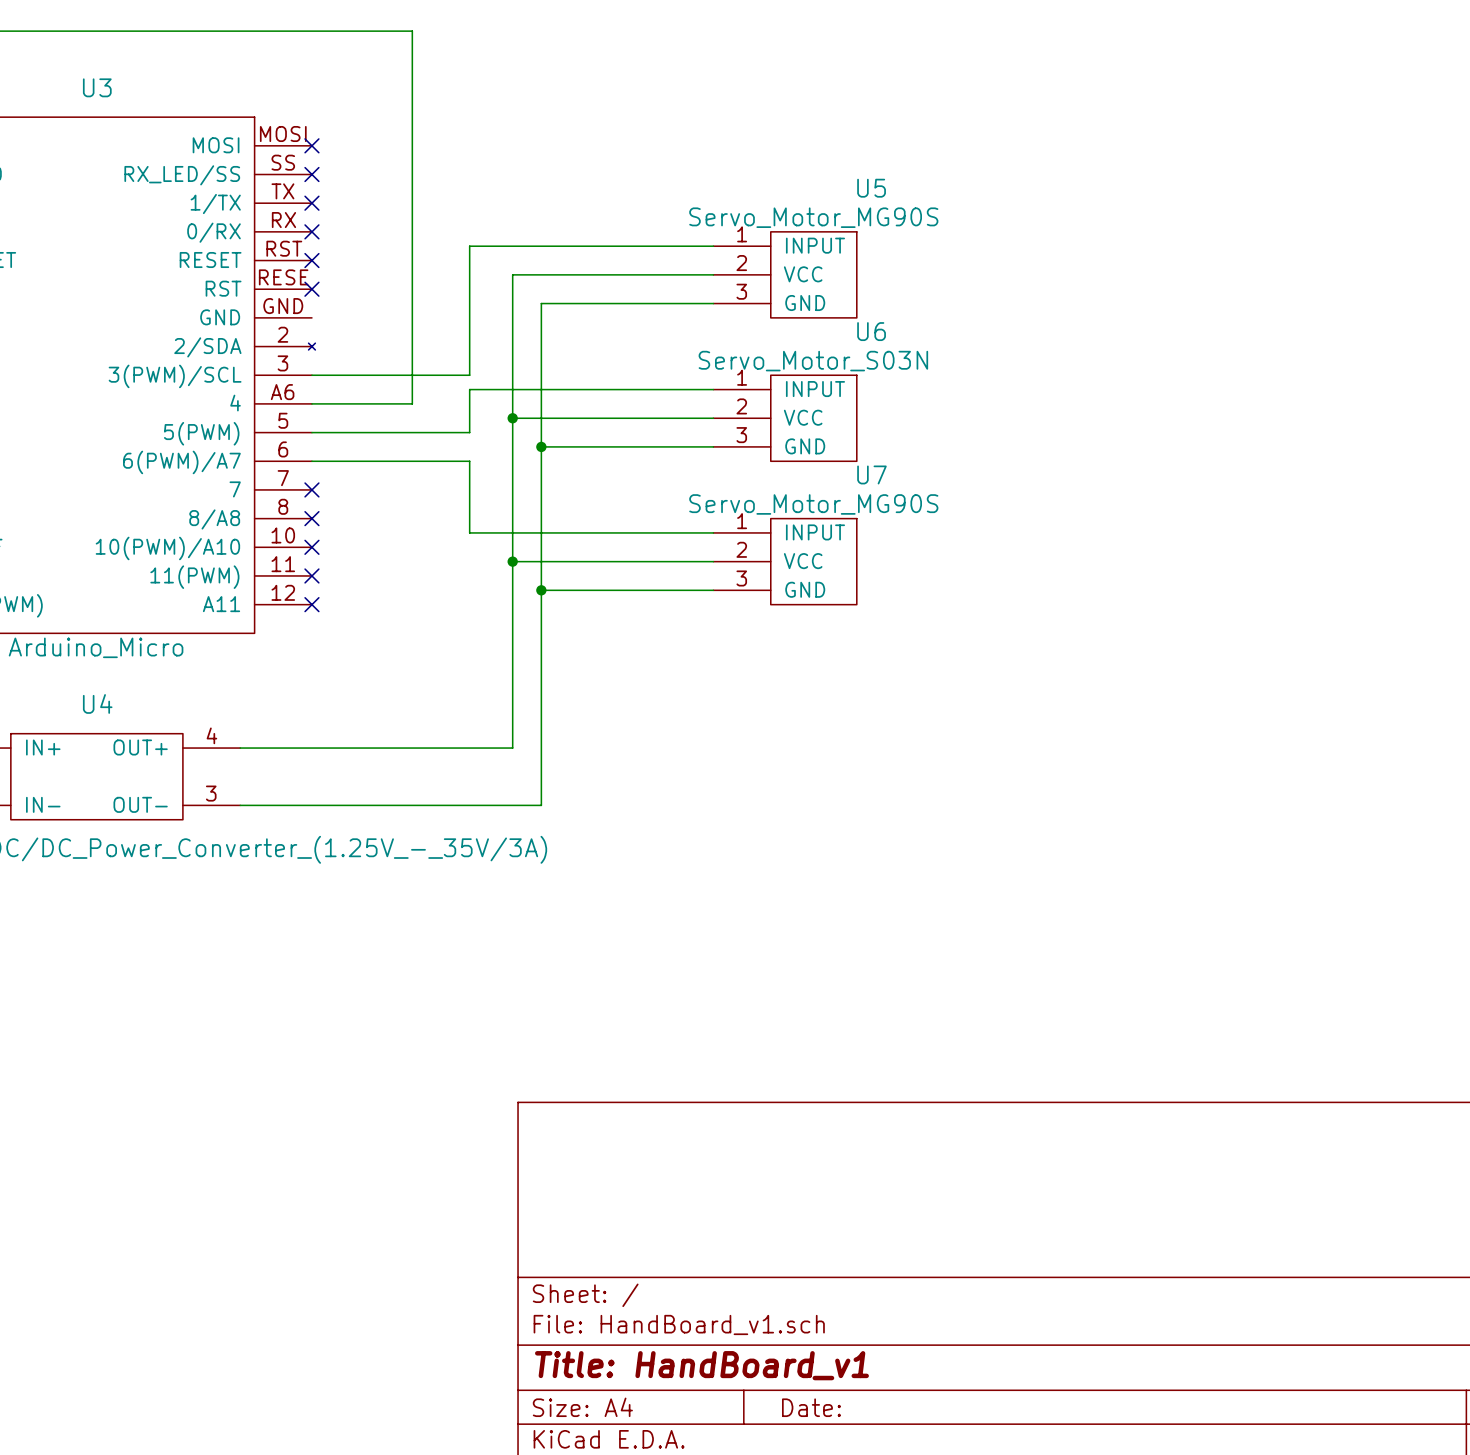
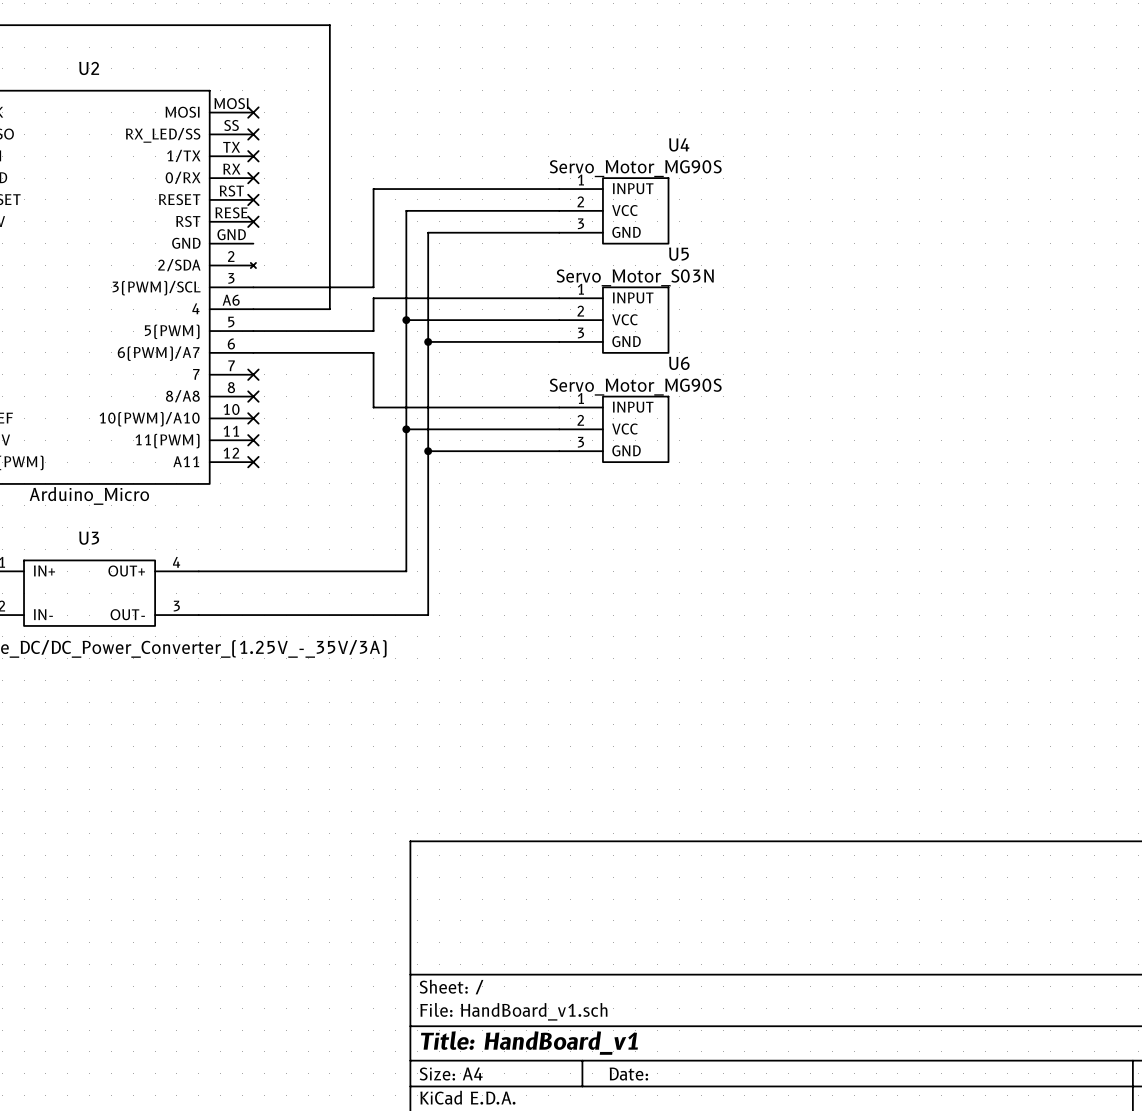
U3 name: U3 (97, 87) -> U2 (89, 68)
U5 name: U5 (871, 188) -> U4 (679, 144)
U6 name: U6 (871, 331) -> U5 (678, 254)
U7 name: U7 (871, 474) -> U6 (679, 363)
U4 name: U4 (97, 703) -> U3 (89, 538)

